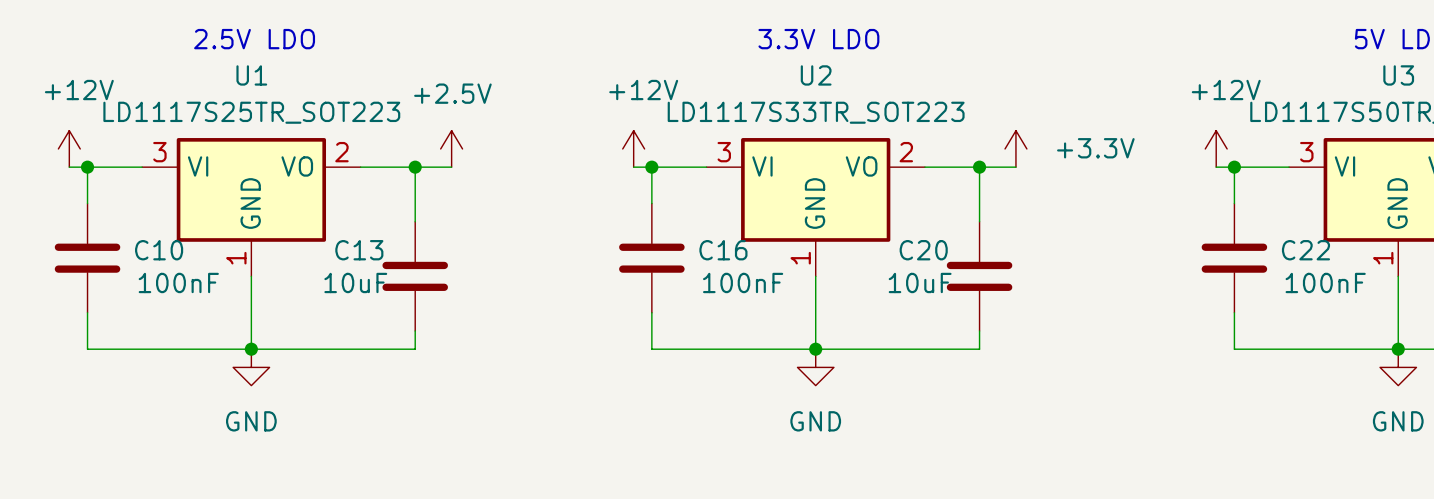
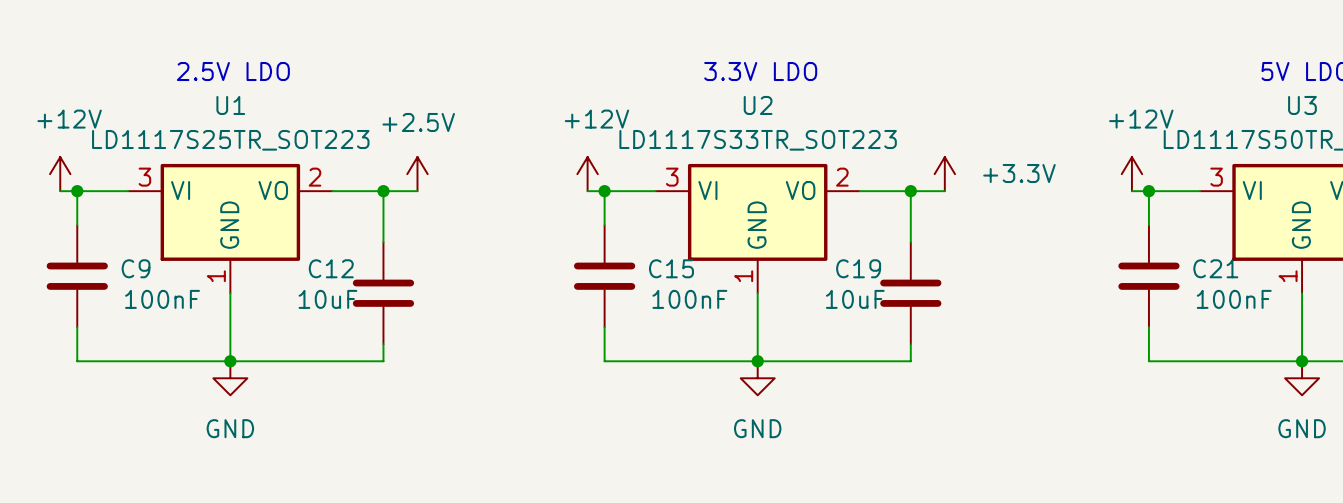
C10 name: C10 (159, 250) -> C9 (136, 268)
C13 name: C13 (359, 250) -> C12 (331, 268)
C16 name: C16 (723, 250) -> C15 (671, 268)
C20 name: C20 (923, 250) -> C19 (858, 268)
C22 name: C22 (1305, 250) -> C21 (1215, 268)

